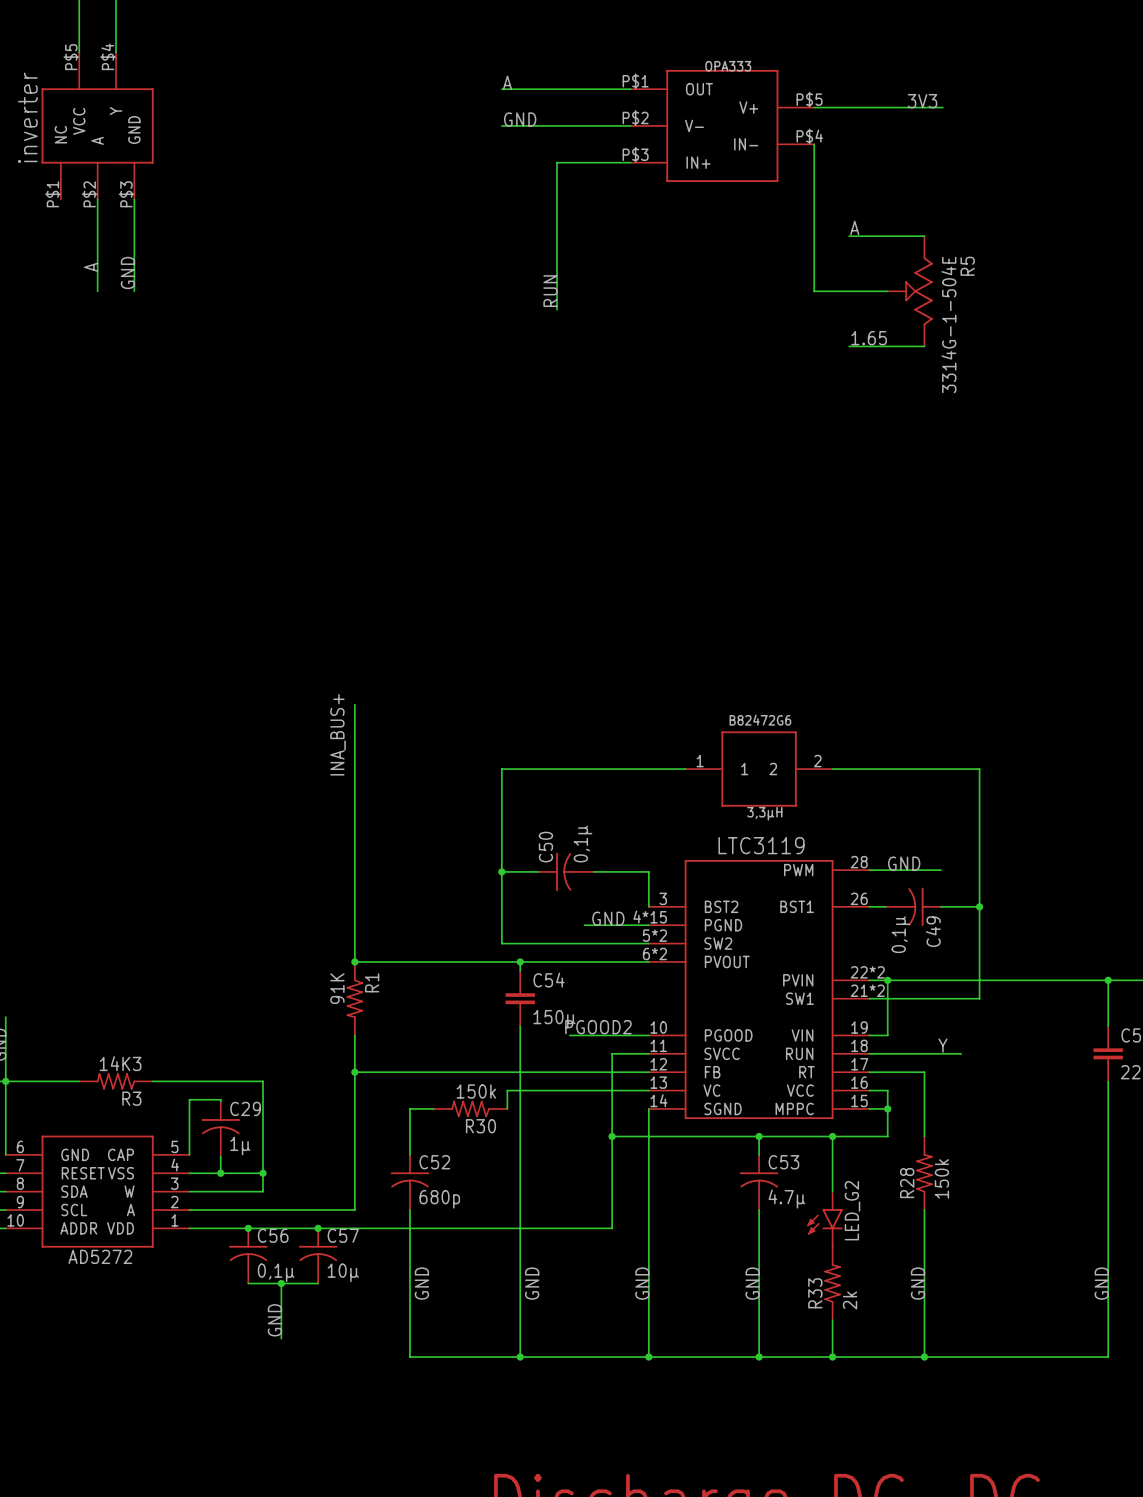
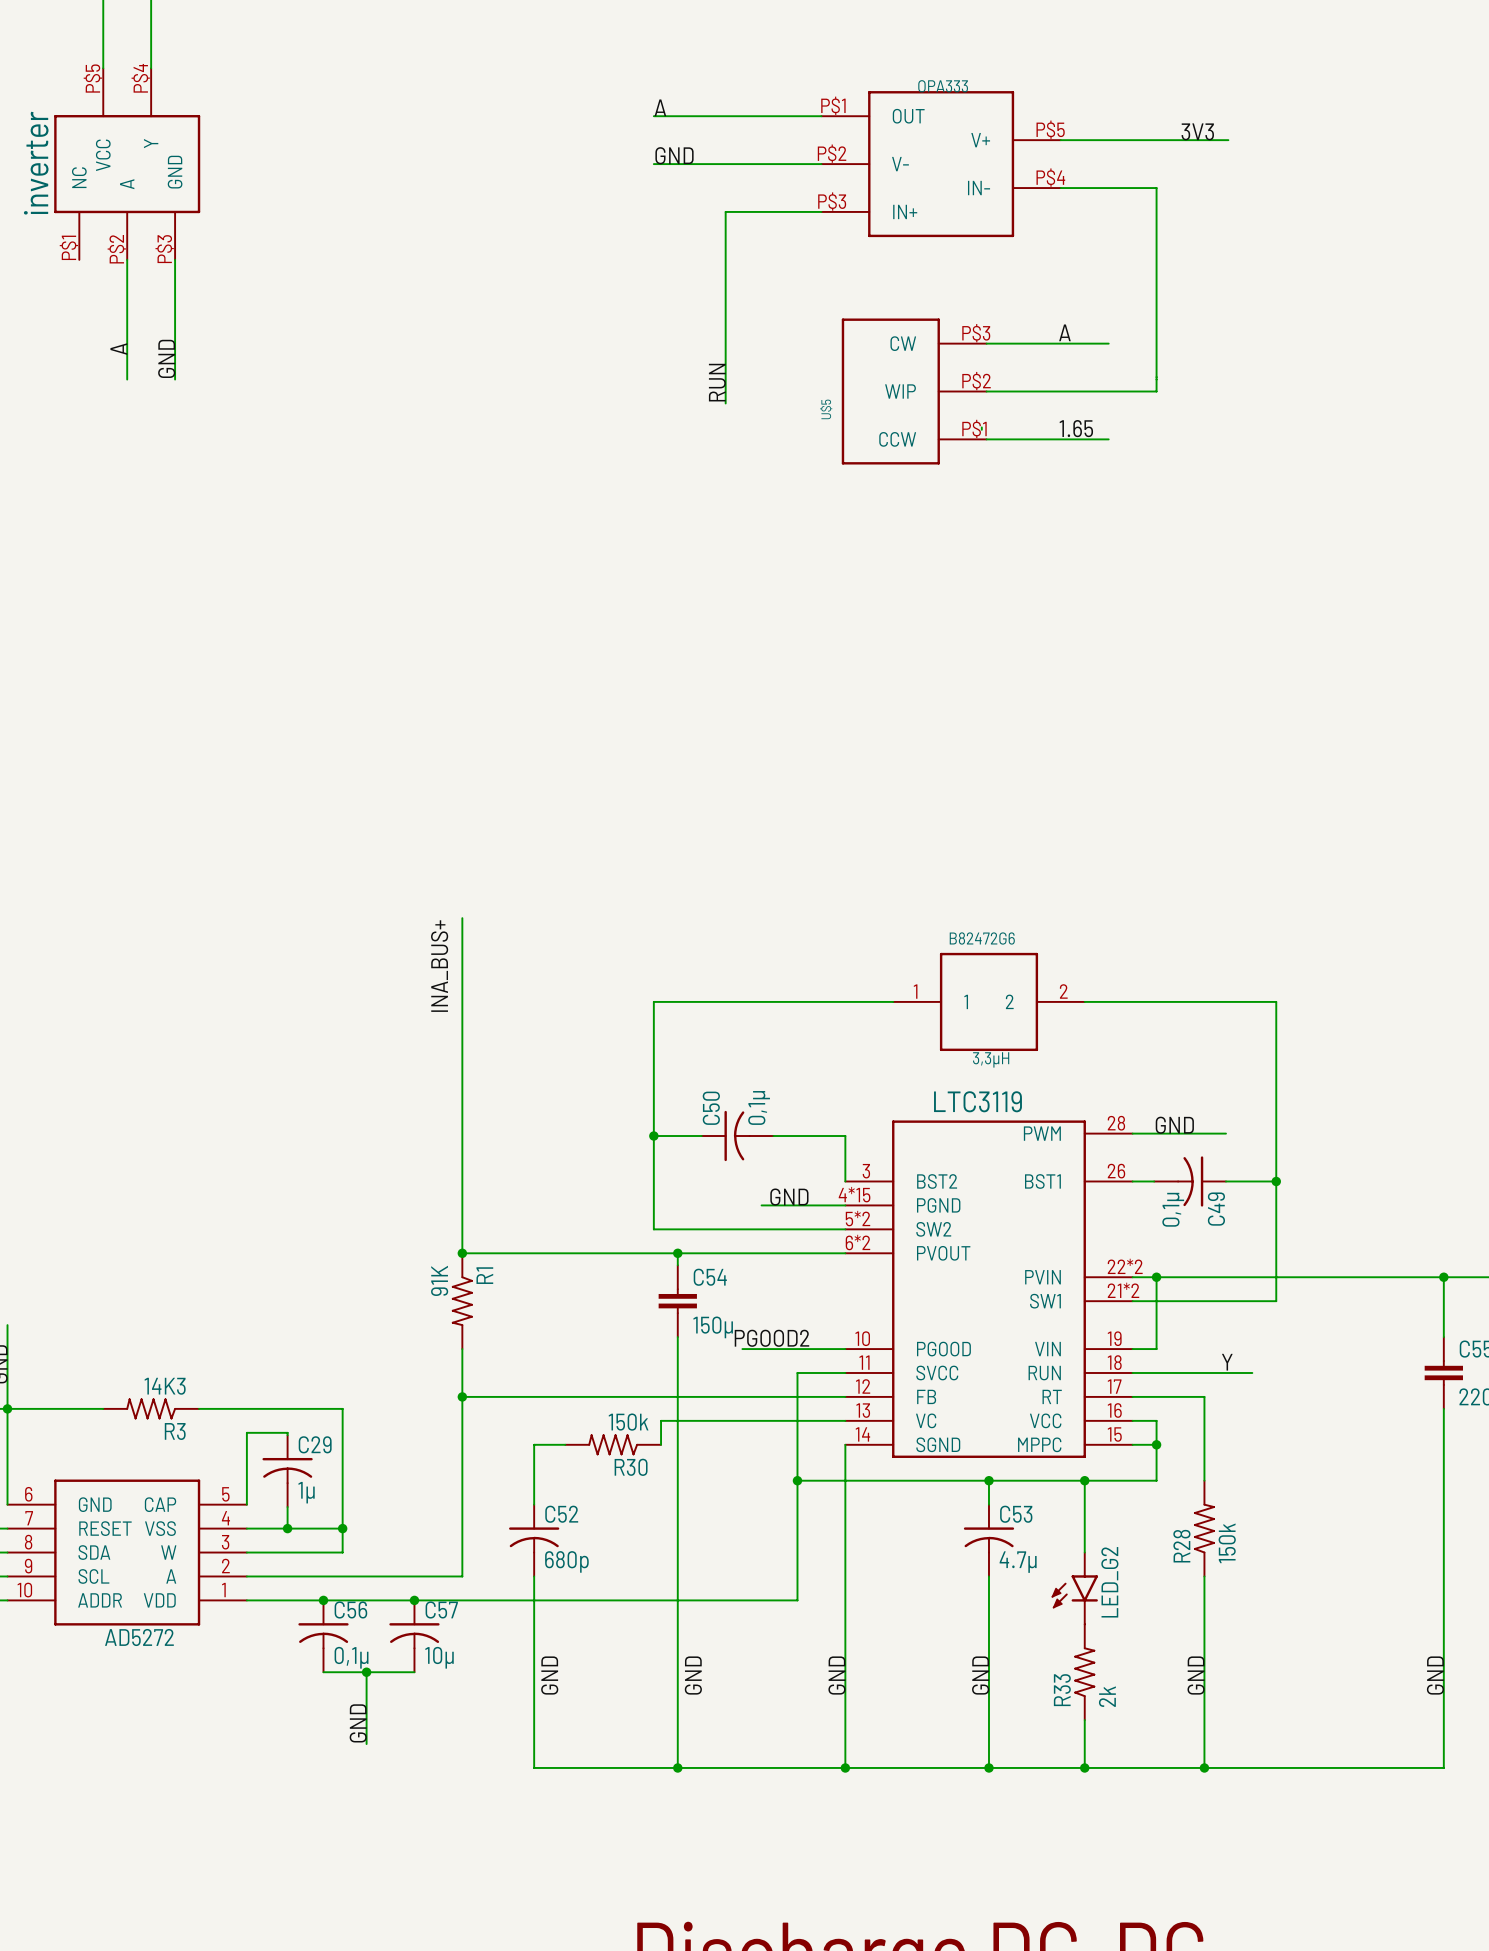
wire: (814, 144) (814, 291) (887, 291) -> (1060, 188) (1156, 188) (1156, 391) (986, 391)
label position: A (854, 227) -> A (1064, 332)
wire: (849, 236) (924, 236) -> none
wire: none -> (986, 343) (1108, 343)
R5: 3314G-1-504E (910, 291) -> none
U$5: none -> (914, 391)
wire: none -> (981, 427) (981, 429)
wire: none -> (986, 439) (1108, 439)
label position: 1.65 (869, 338) -> 1.65 (1076, 428)
wire: (849, 346) (924, 346) -> none

